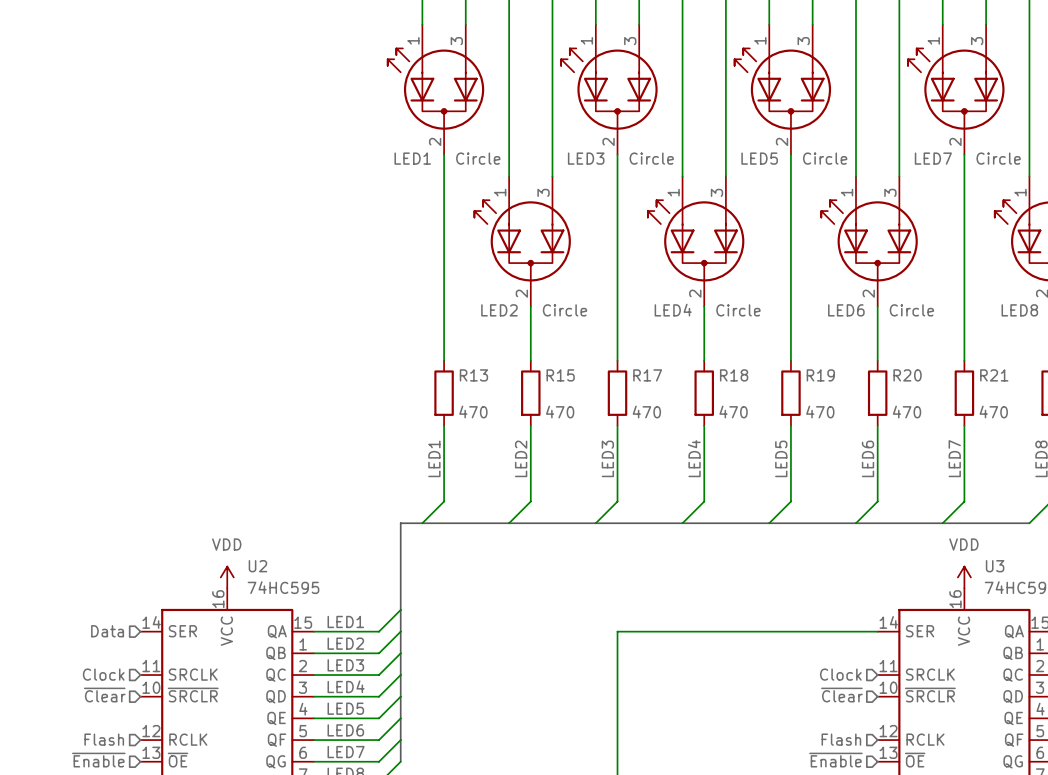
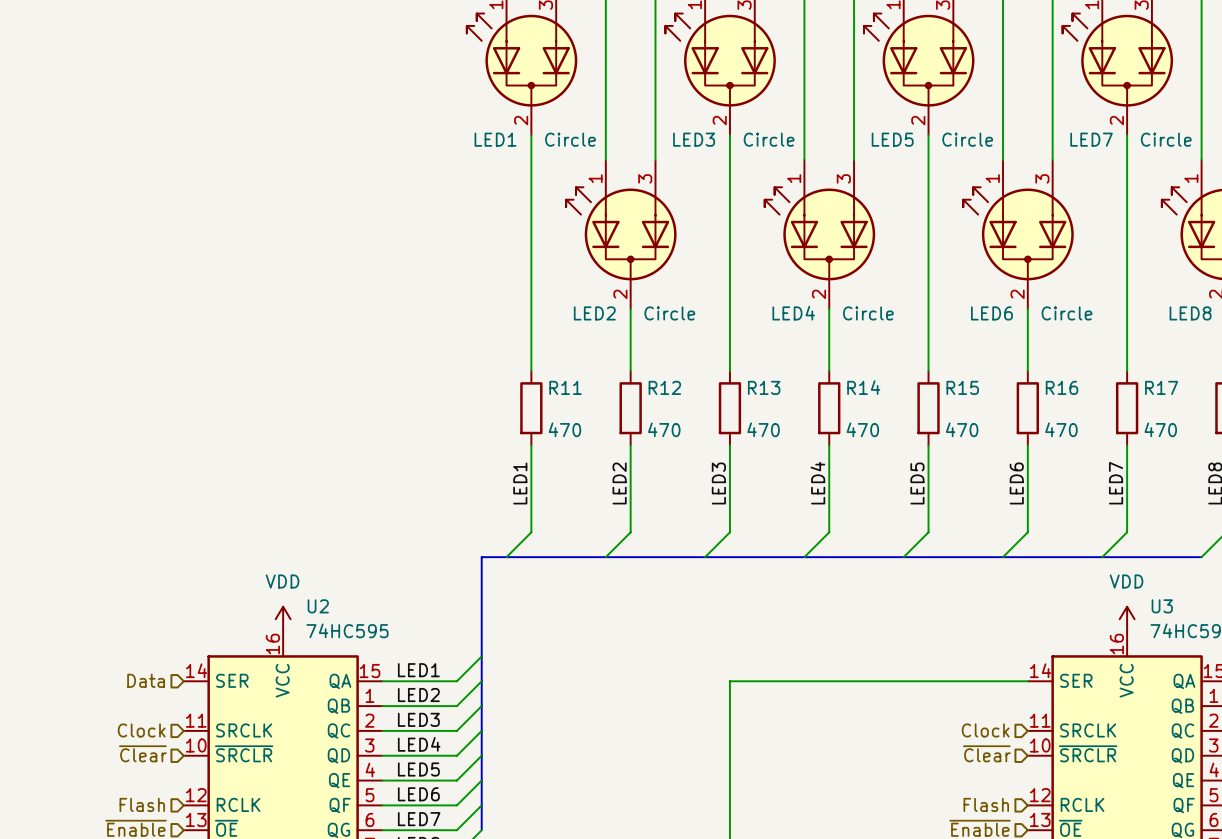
R13 name: R13 (473, 375) -> R11 (565, 387)
R15 name: R15 (560, 375) -> R12 (664, 387)
R17 name: R17 (647, 375) -> R13 (764, 387)
R18 name: R18 (734, 375) -> R14 (863, 387)
R19 name: R19 (820, 375) -> R15 (962, 387)
R20 name: R20 (907, 375) -> R16 (1062, 387)
R21 name: R21 (994, 375) -> R17 (1161, 387)

